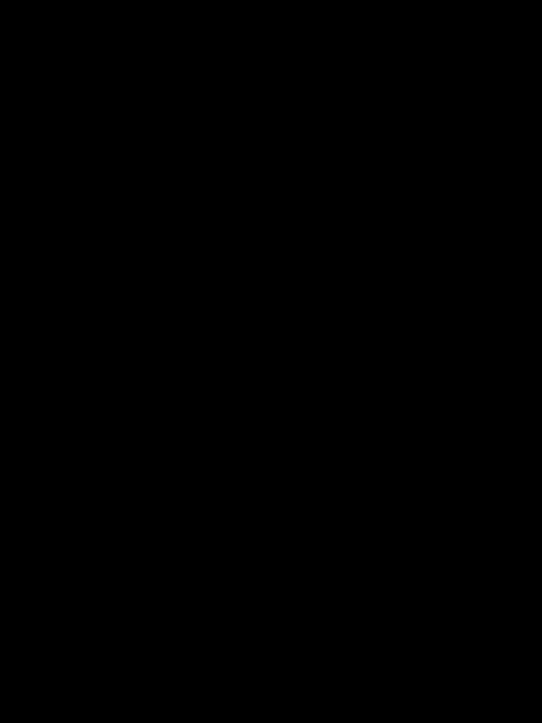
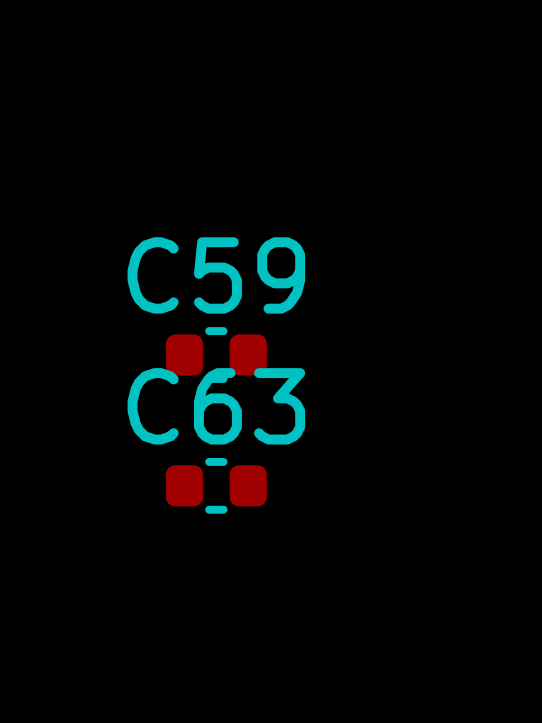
C59: none -> (216, 354)
C63: none -> (216, 485)

